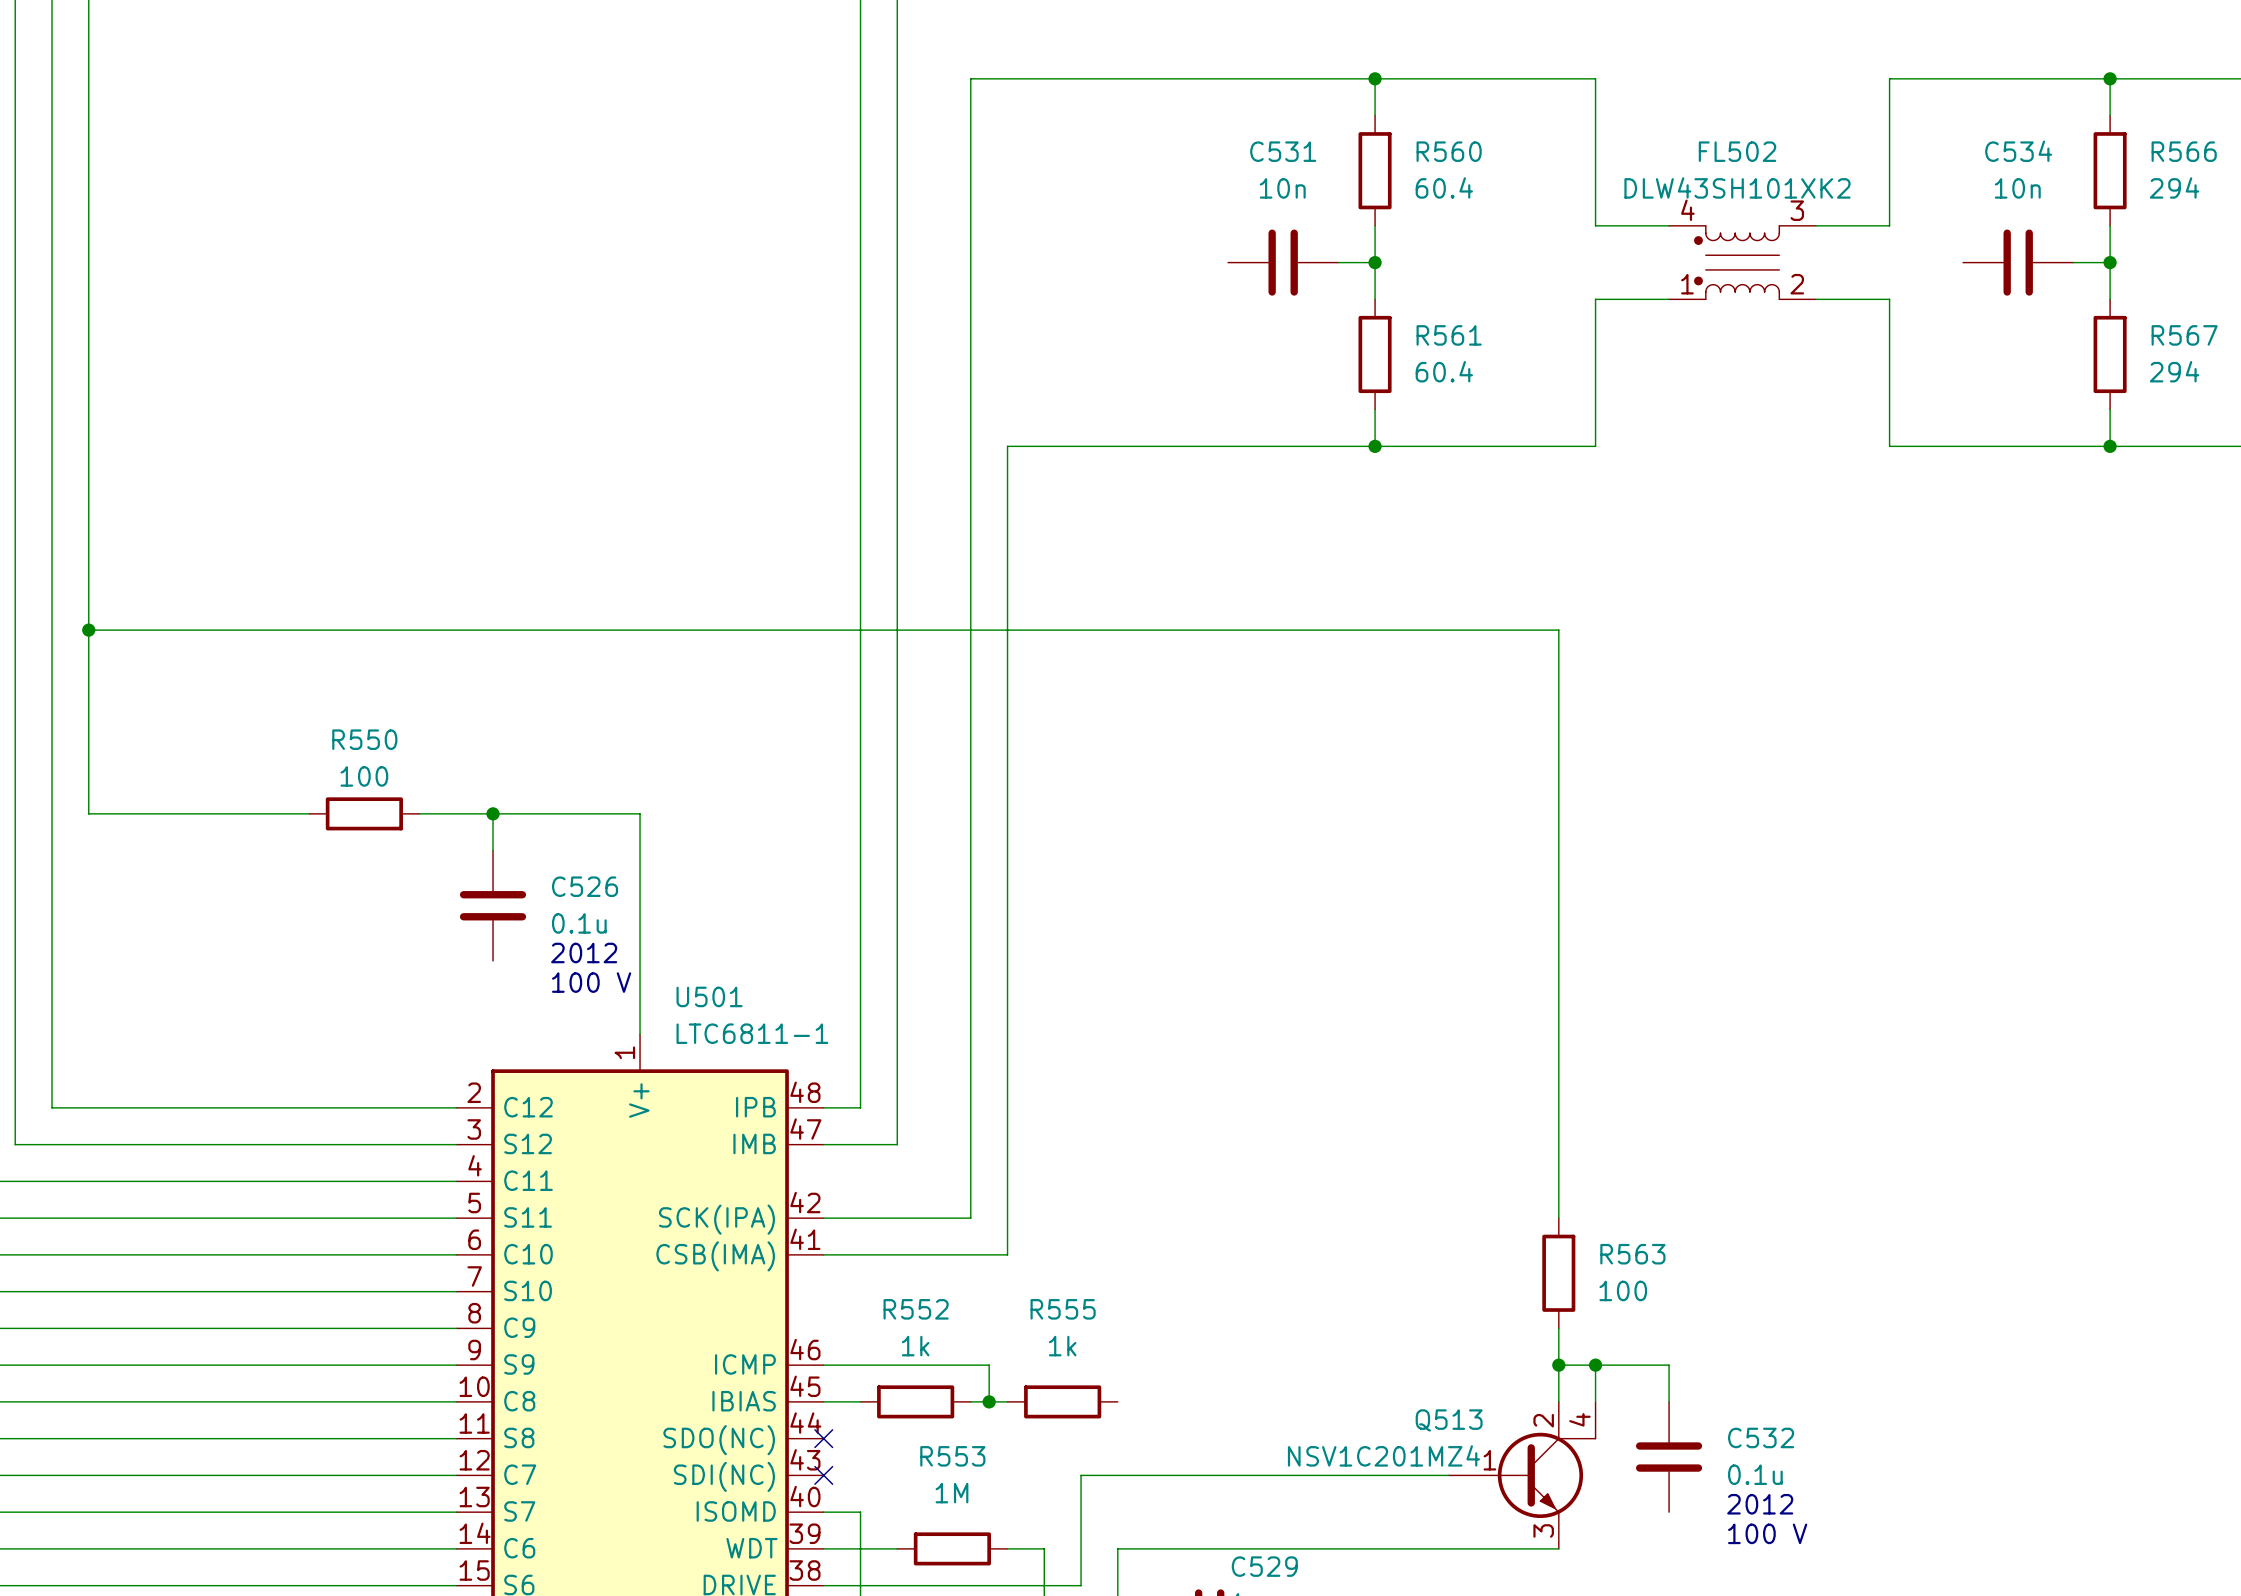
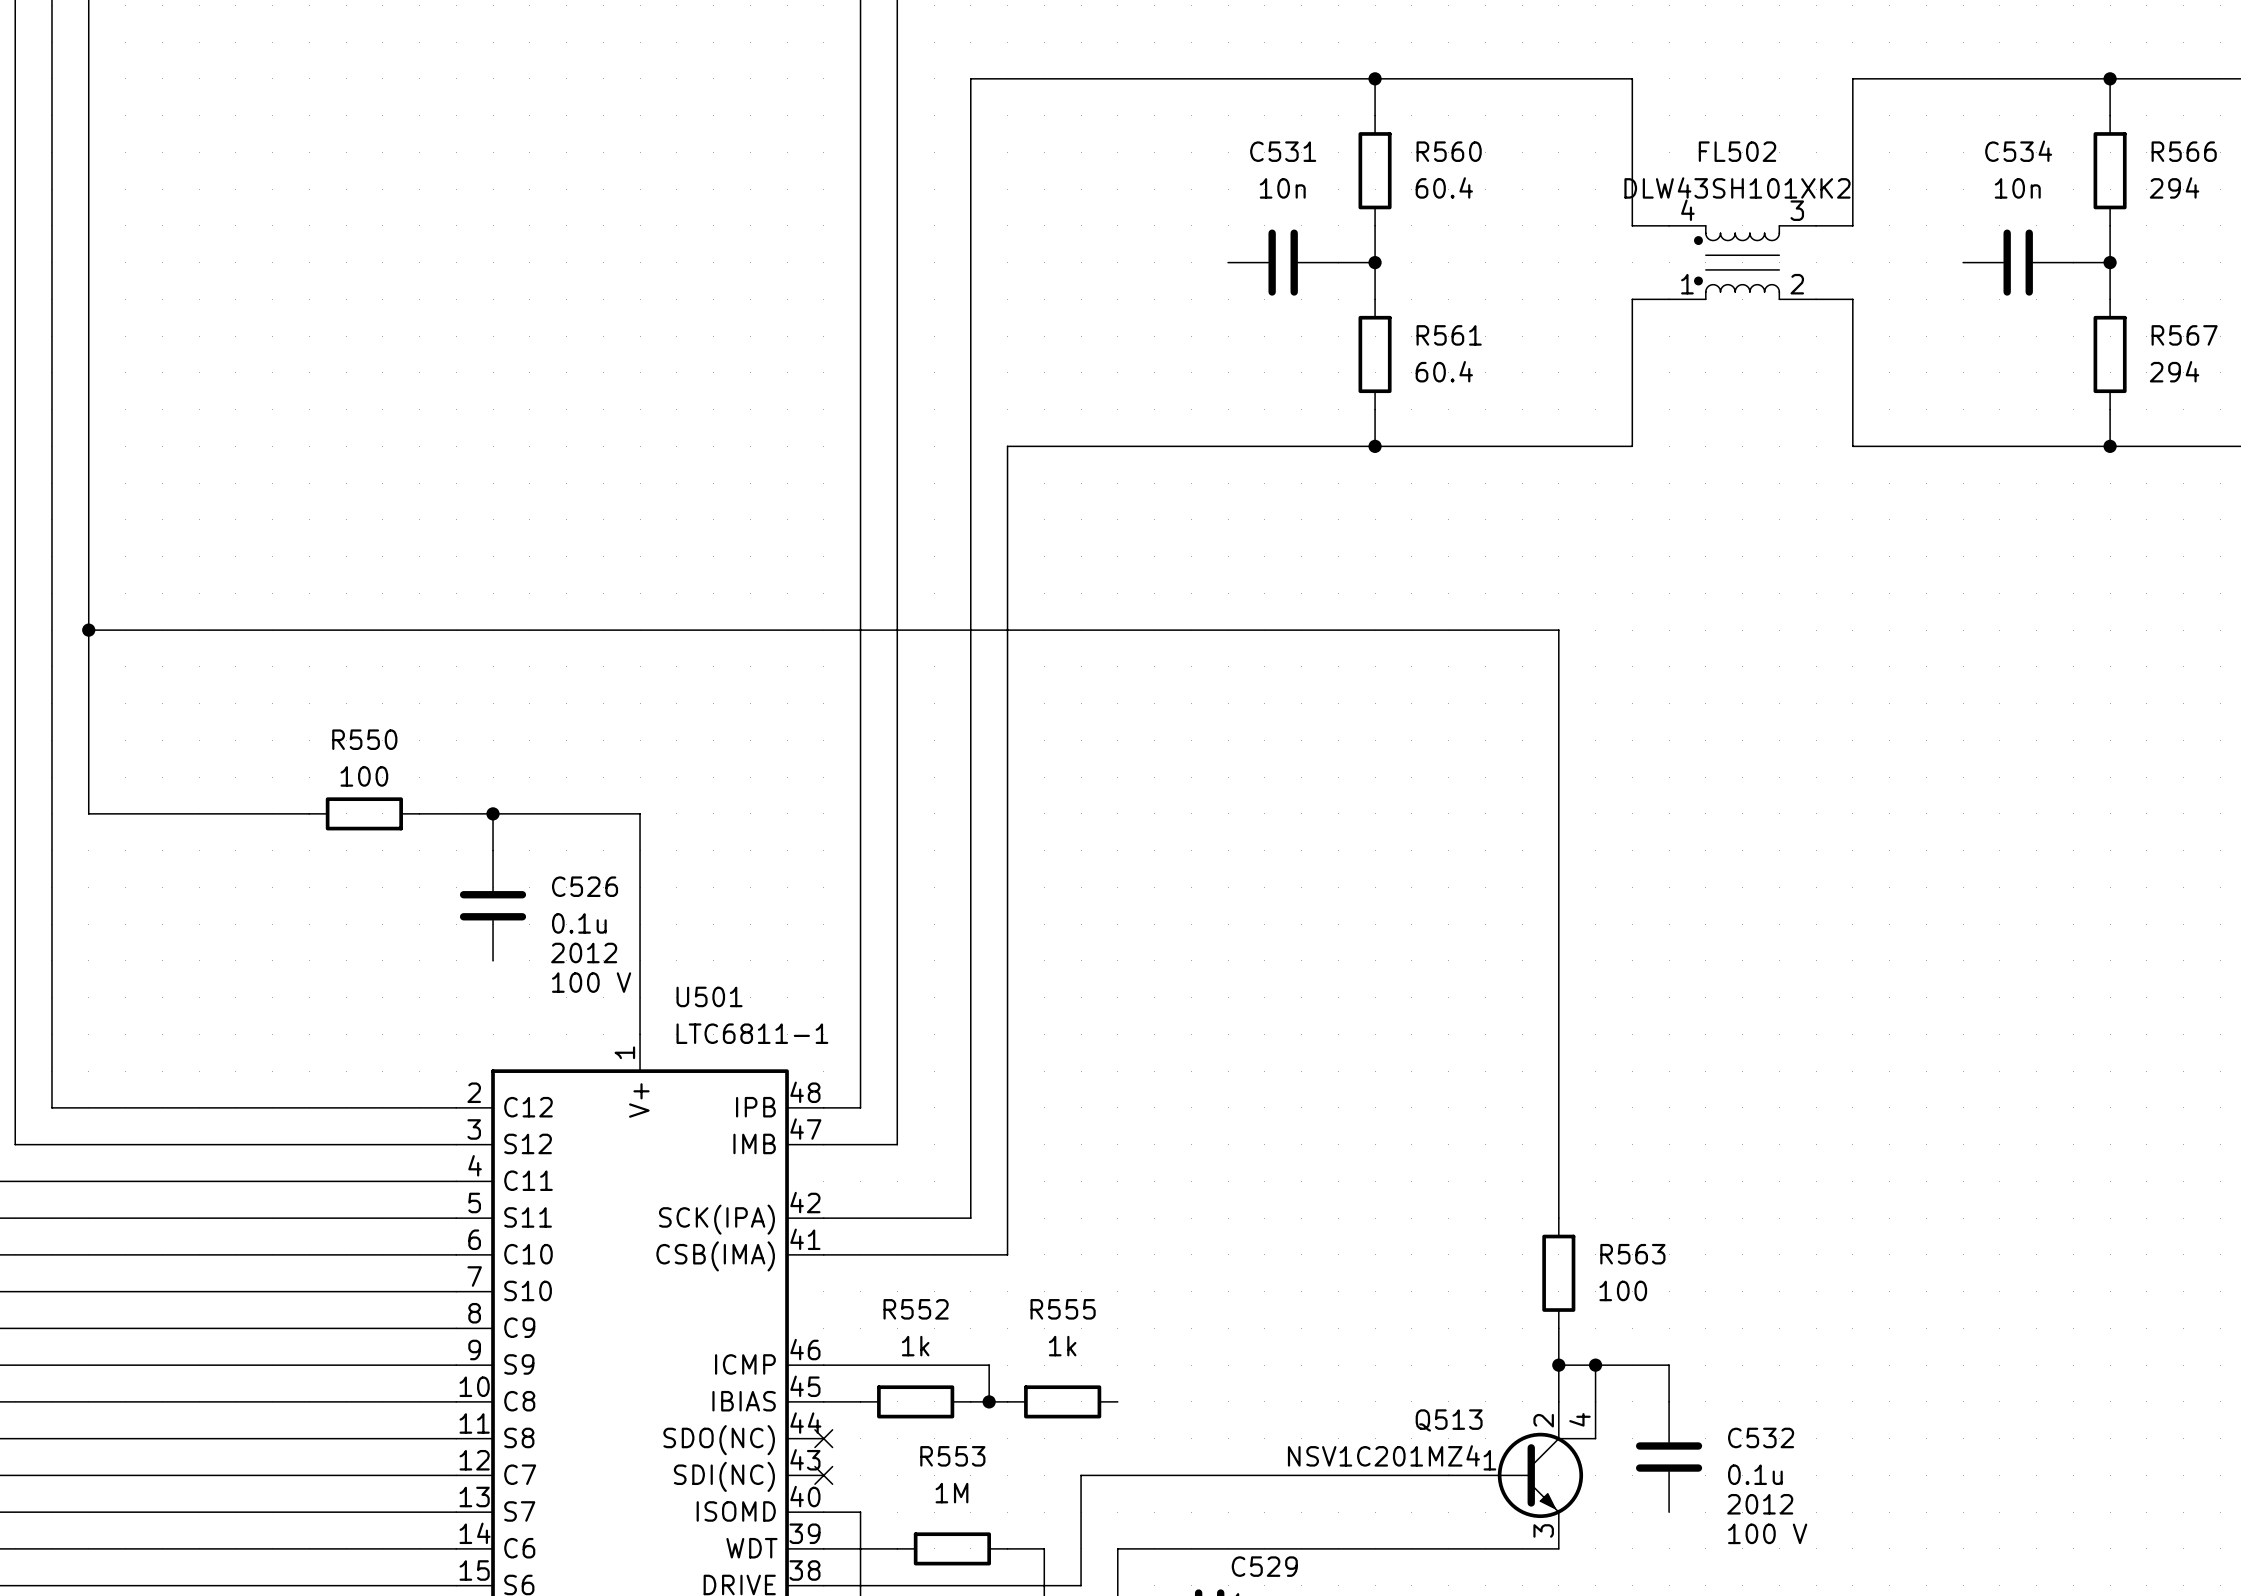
wire: (1595, 78) (1595, 225) (1632, 225) -> (1595, 78) (1632, 78) (1632, 225)
wire: (1889, 78) (1889, 225) (1852, 225) -> (1889, 78) (1852, 78) (1852, 225)
wire: (1632, 299) (1595, 299) (1595, 446) -> (1632, 299) (1632, 446) (1595, 446)
wire: (1852, 299) (1889, 299) (1889, 446) -> (1852, 299) (1852, 446) (1889, 446)

